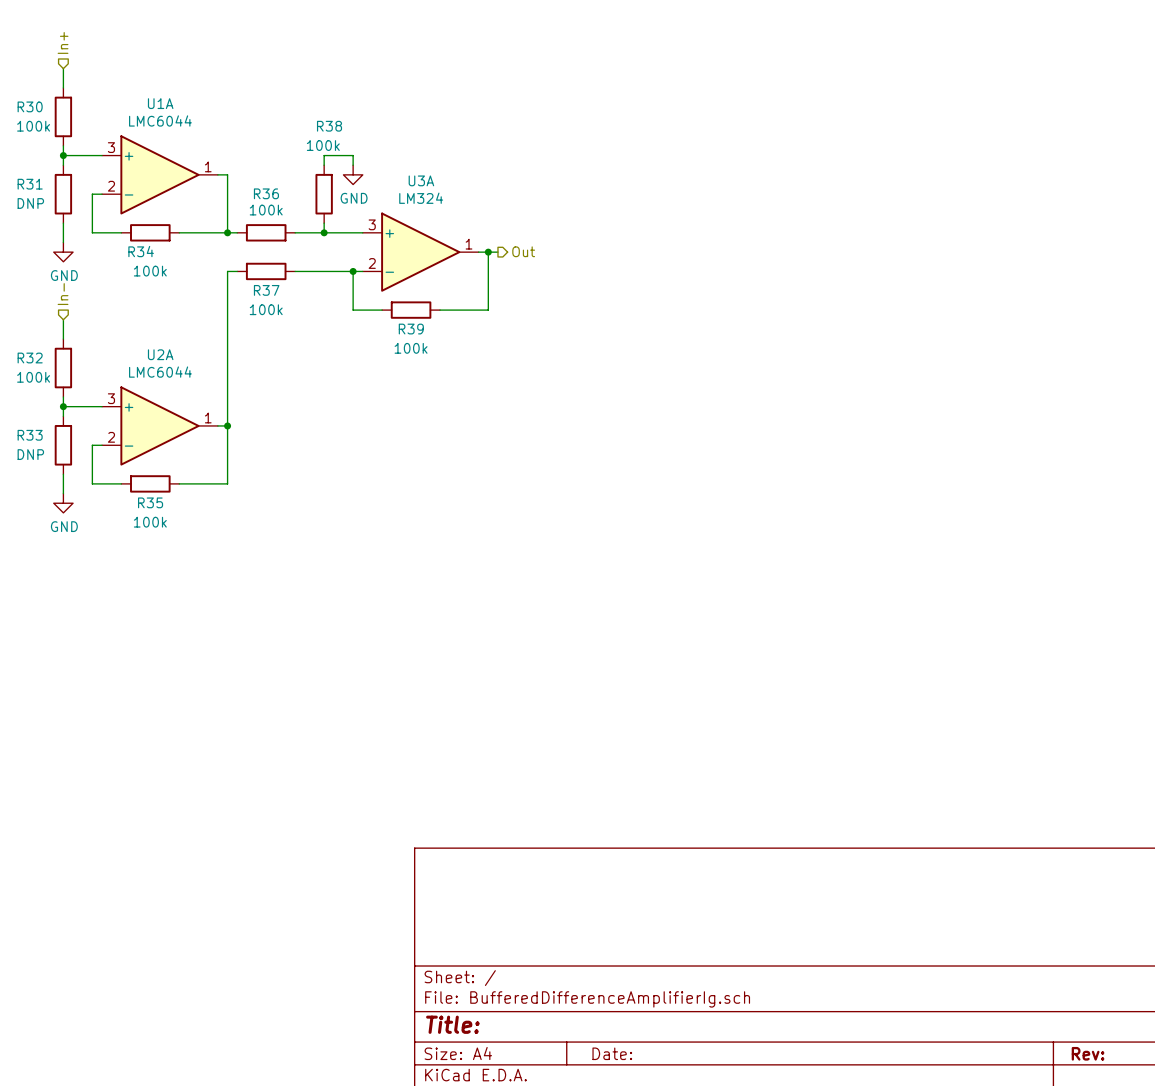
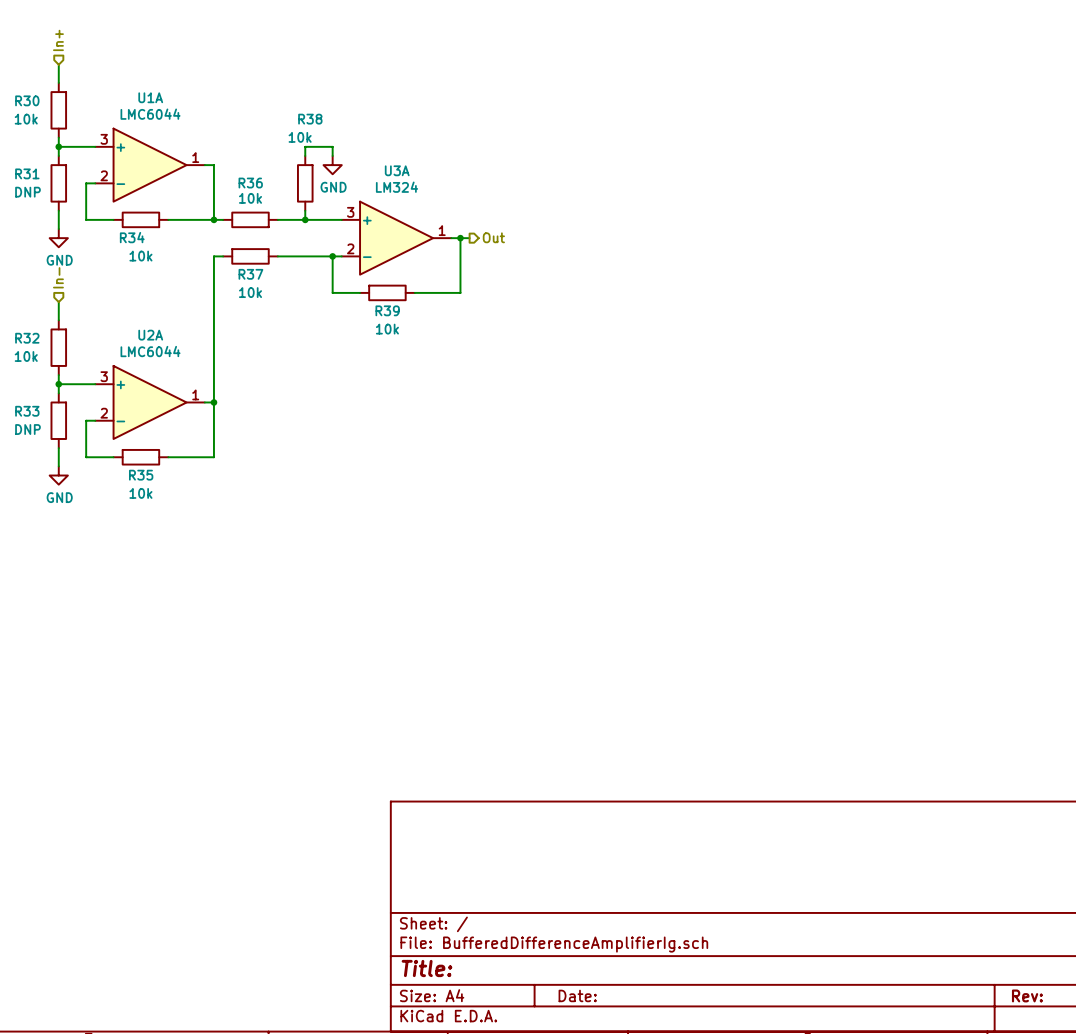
R30 value: 100k (33, 126) -> 10k (26, 119)
R38 value: 100k (323, 145) -> 10k (300, 137)
R36 value: 100k (266, 210) -> 10k (250, 198)
R34 value: 100k (150, 271) -> 10k (140, 256)
R37 value: 100k (266, 309) -> 10k (250, 292)
R39 value: 100k (411, 348) -> 10k (387, 329)
R32 value: 100k (33, 377) -> 10k (26, 356)
R35 value: 100k (150, 522) -> 10k (140, 493)

